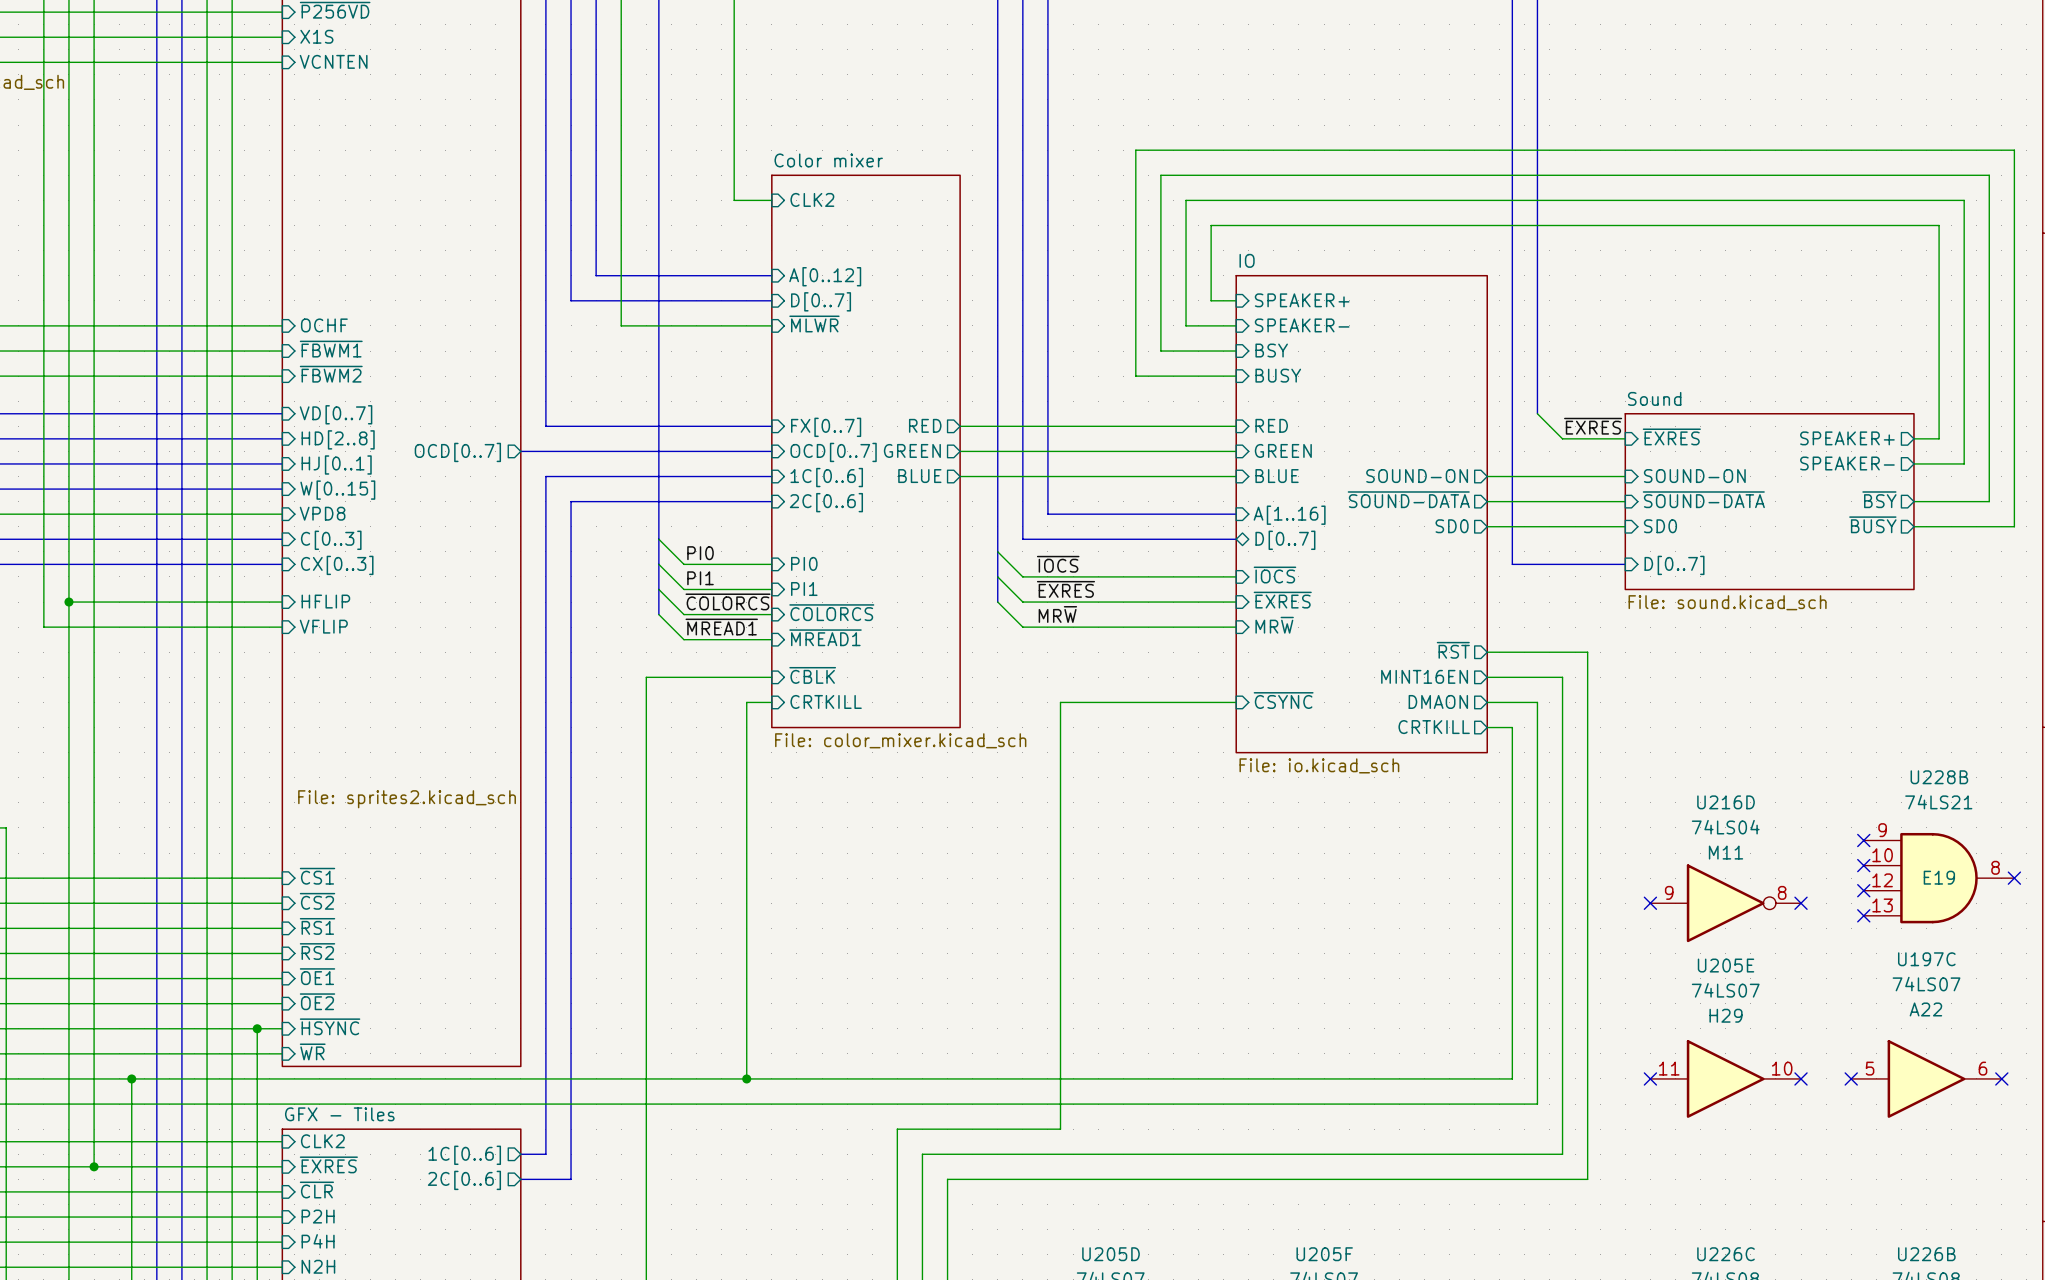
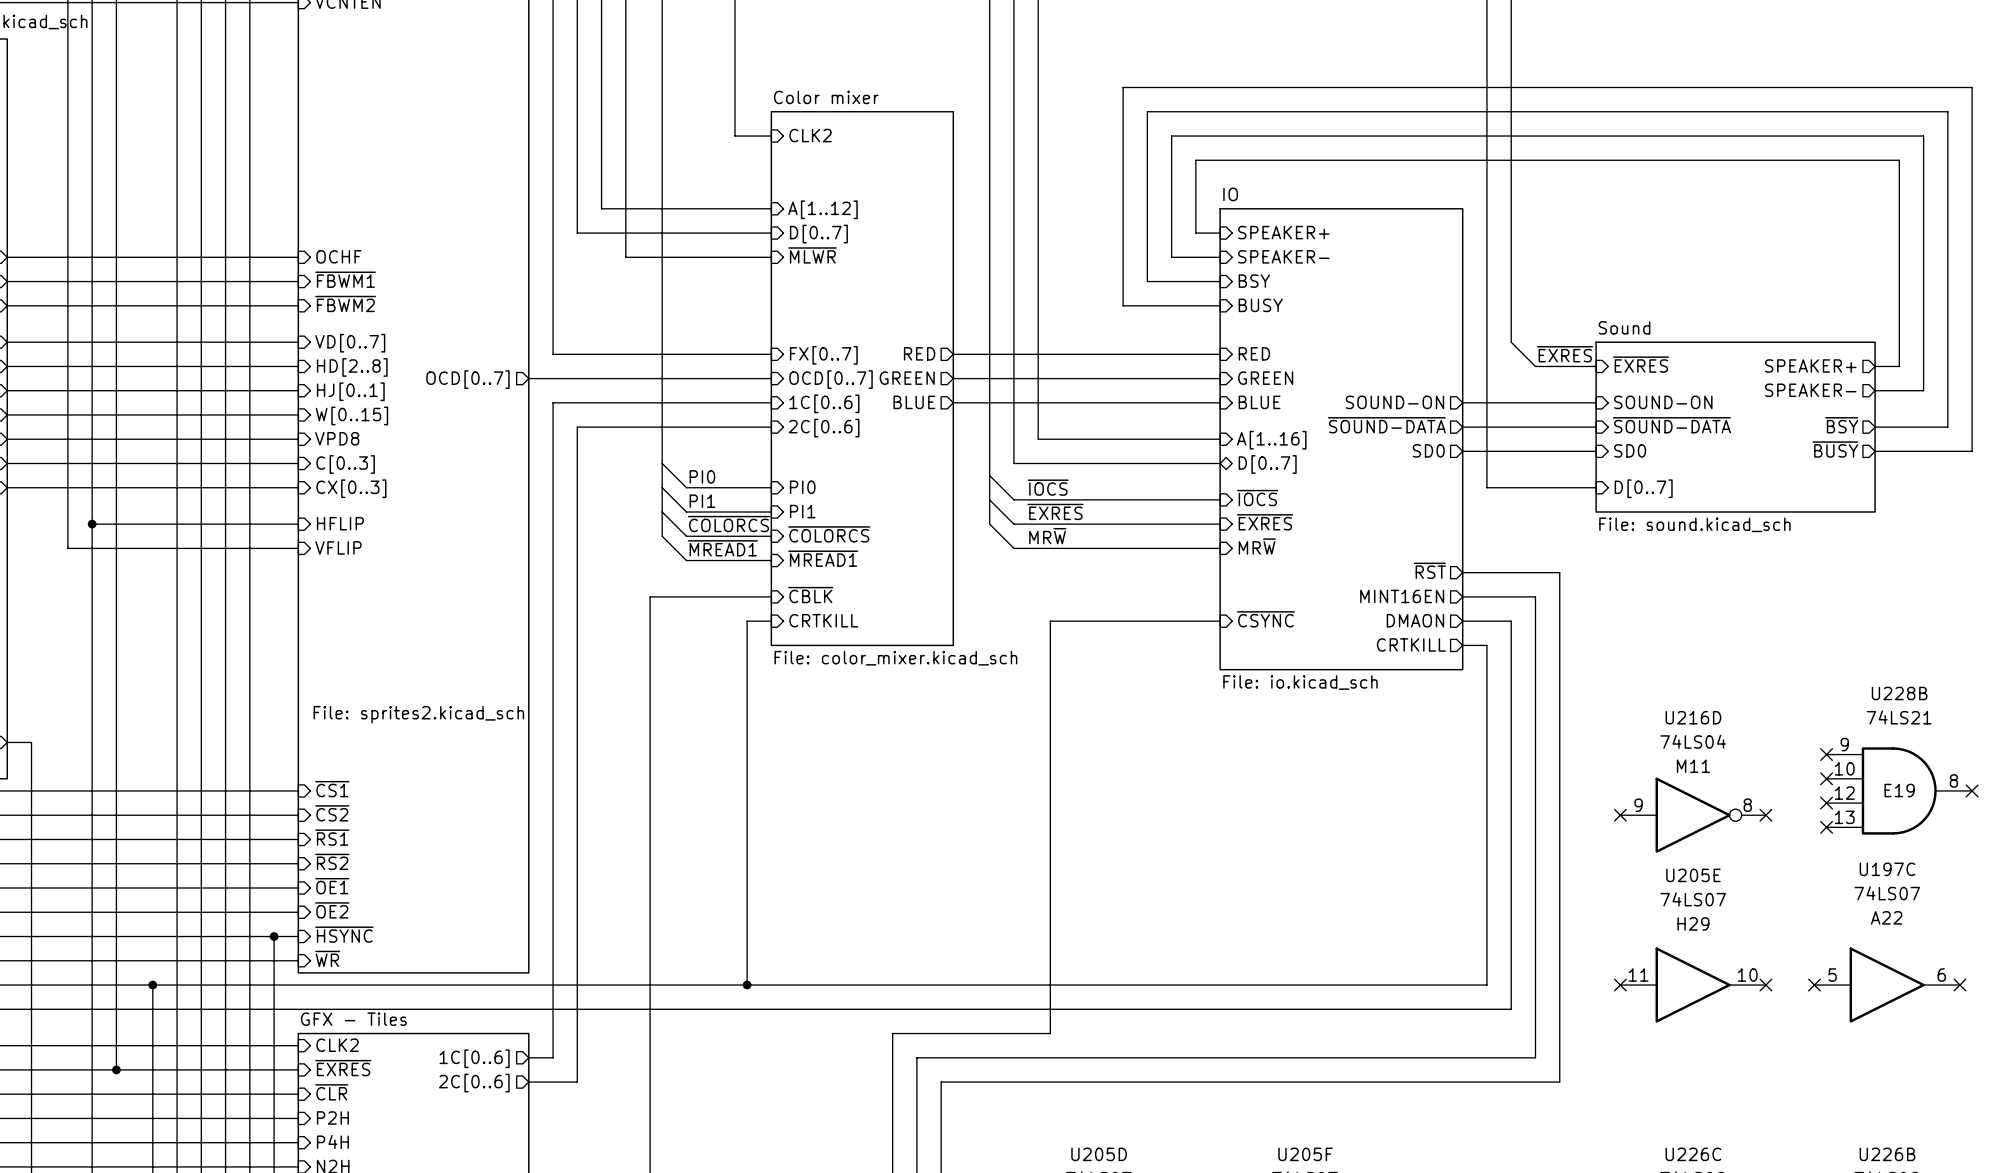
sheet pin: A[0..12] (825, 276) -> A[1..12] (822, 209)

